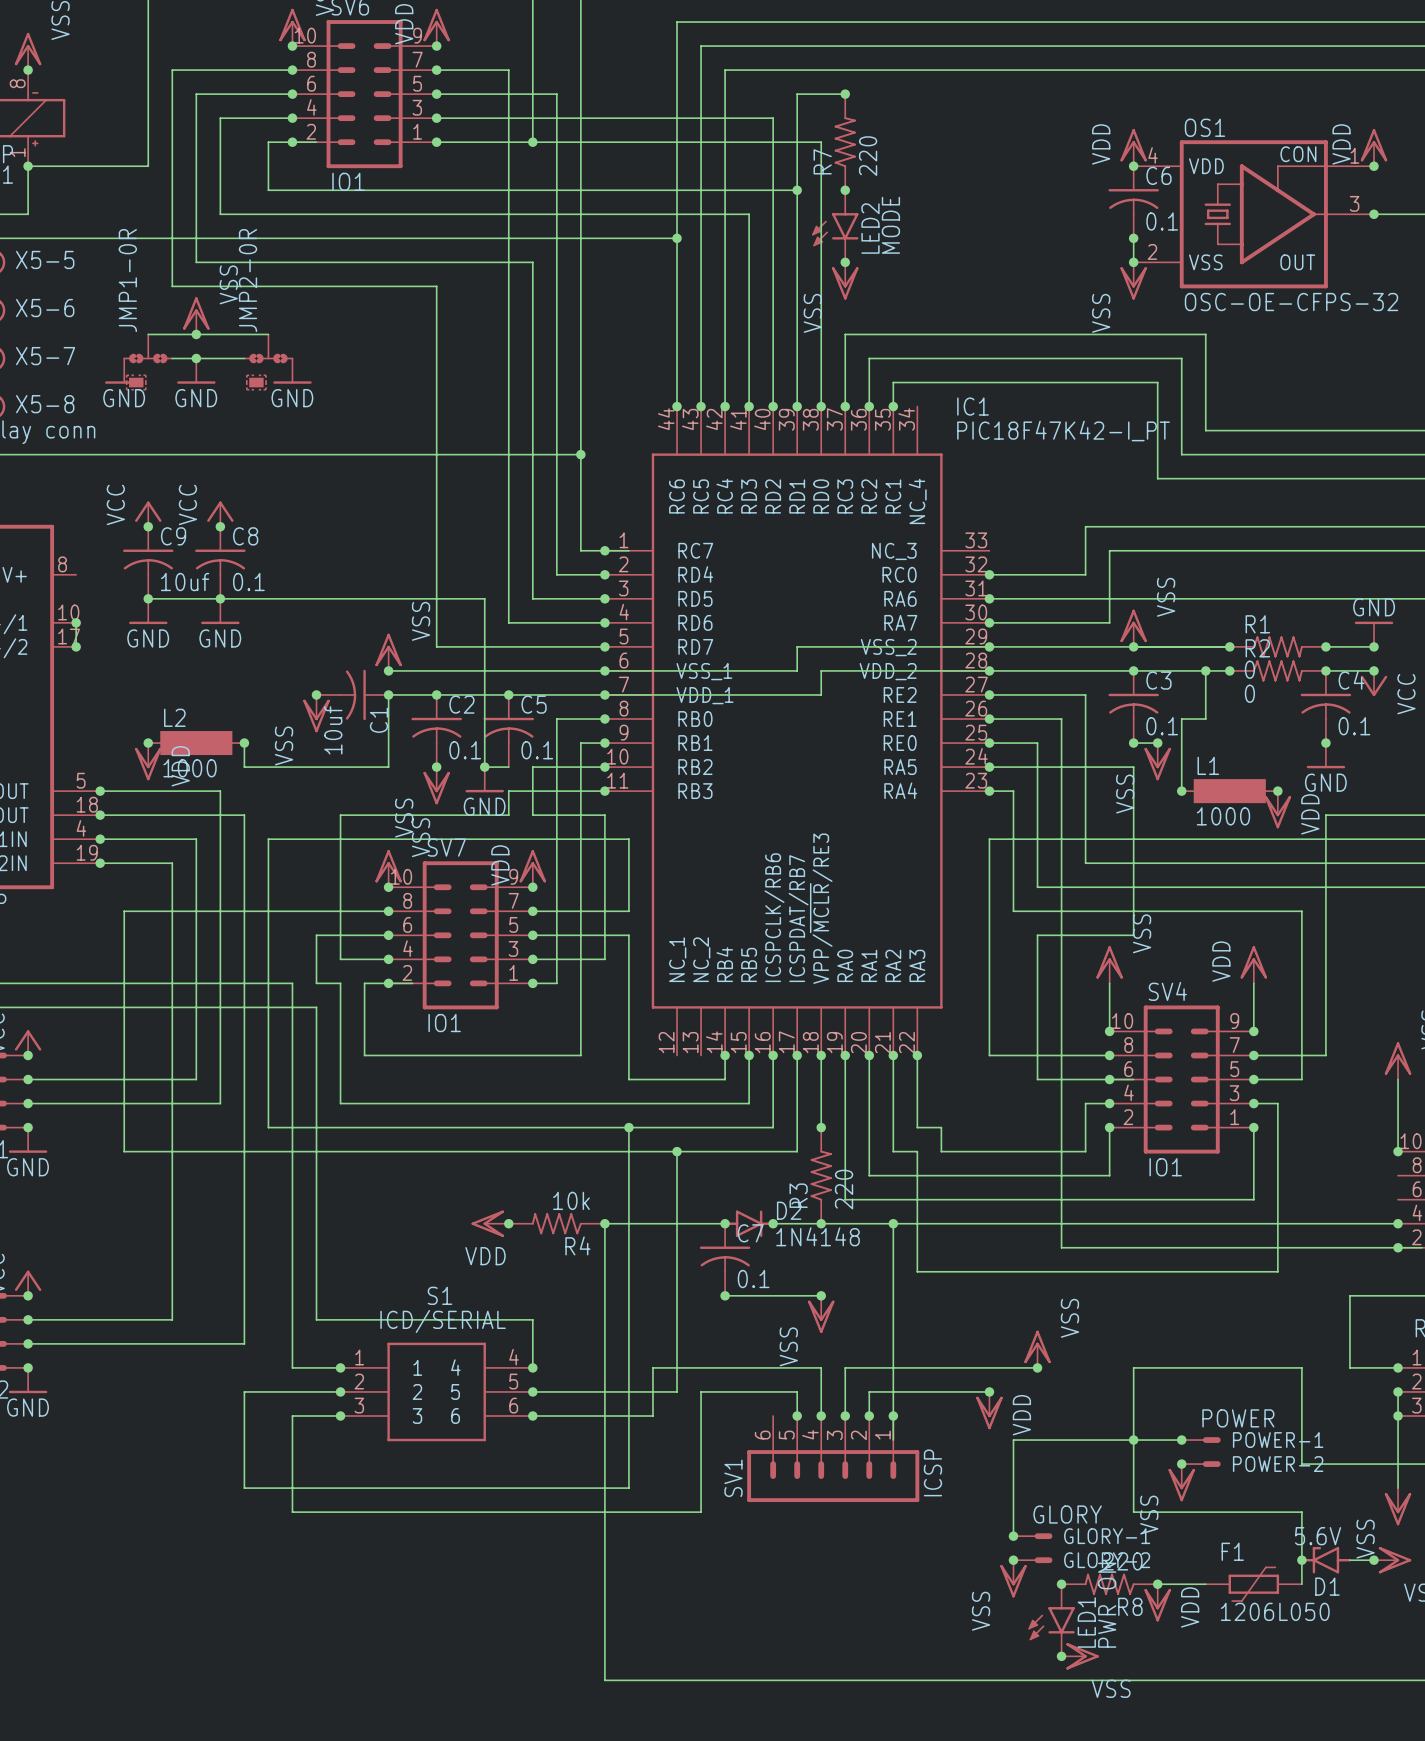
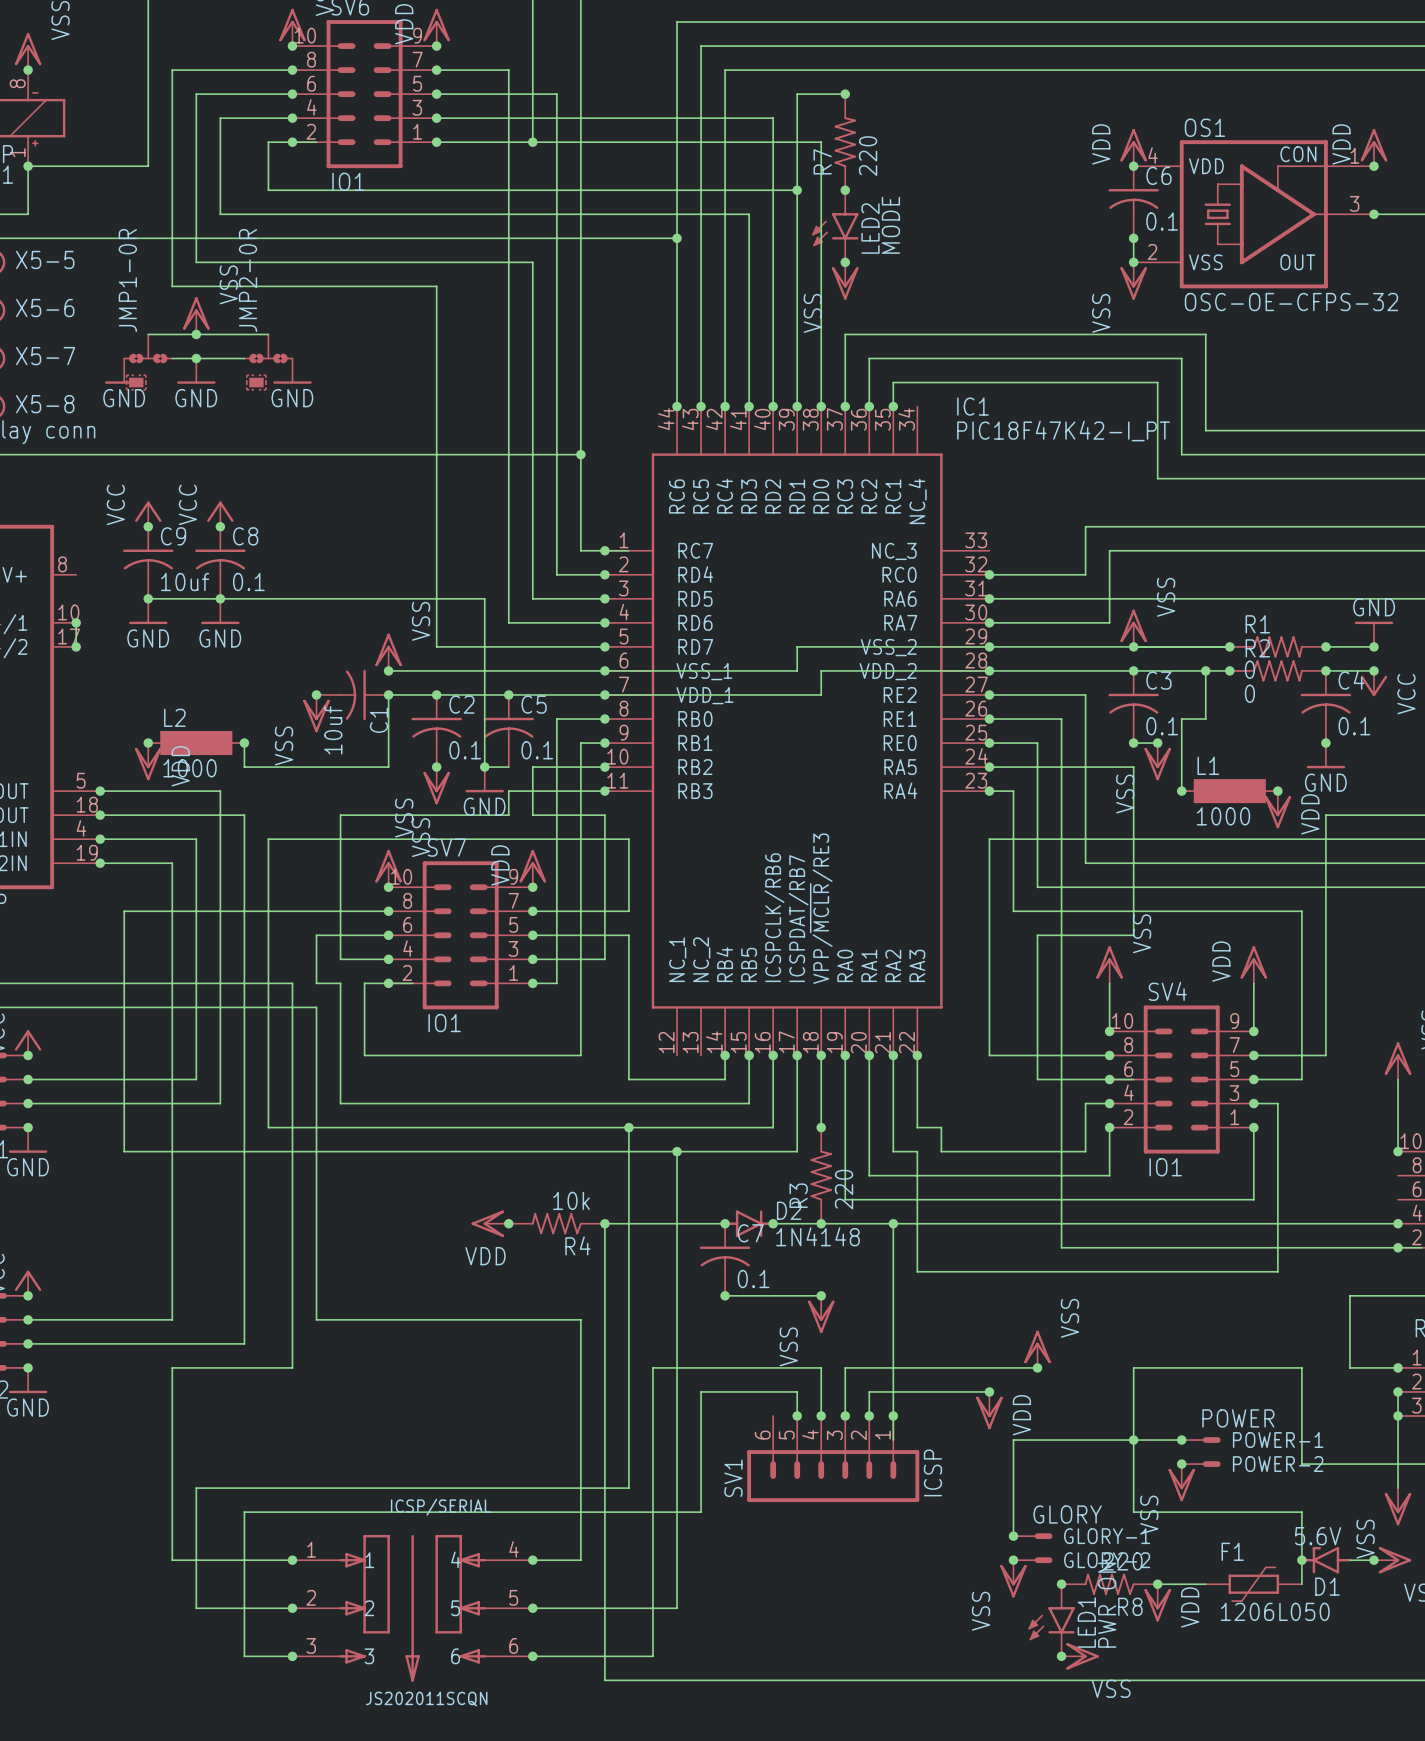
wire: (532, 1319) (532, 1367) -> (532, 1319) (580, 1319) (580, 1560) (532, 1560)
wire: (292, 1367) (340, 1367) -> (292, 1367) (172, 1367) (172, 1560) (292, 1560)
junction: (340, 1367) -> none
junction: (532, 1367) -> none
wire: (340, 1391) (244, 1391) (244, 1488) -> (292, 1608) (196, 1608) (196, 1488) (244, 1488)
junction: (340, 1391) -> none
S1: ICD/SERIAL (436, 1391) -> none
wire: (532, 1391) (677, 1391) -> (532, 1608) (677, 1608) (677, 1391)
junction: (532, 1391) -> none
wire: (340, 1415) (292, 1415) (292, 1512) -> (292, 1656) (244, 1656) (244, 1512) (292, 1512)
junction: (340, 1415) -> none
wire: (532, 1415) (652, 1415) -> (532, 1656) (652, 1656) (652, 1415)
junction: (532, 1415) -> none
junction: none -> (292, 1560)
junction: none -> (532, 1560)
junction: none -> (292, 1608)
ICSP/SERIAL: none -> JS202011SCQN (412, 1608)
junction: none -> (532, 1608)
junction: none -> (292, 1656)
junction: none -> (532, 1656)

